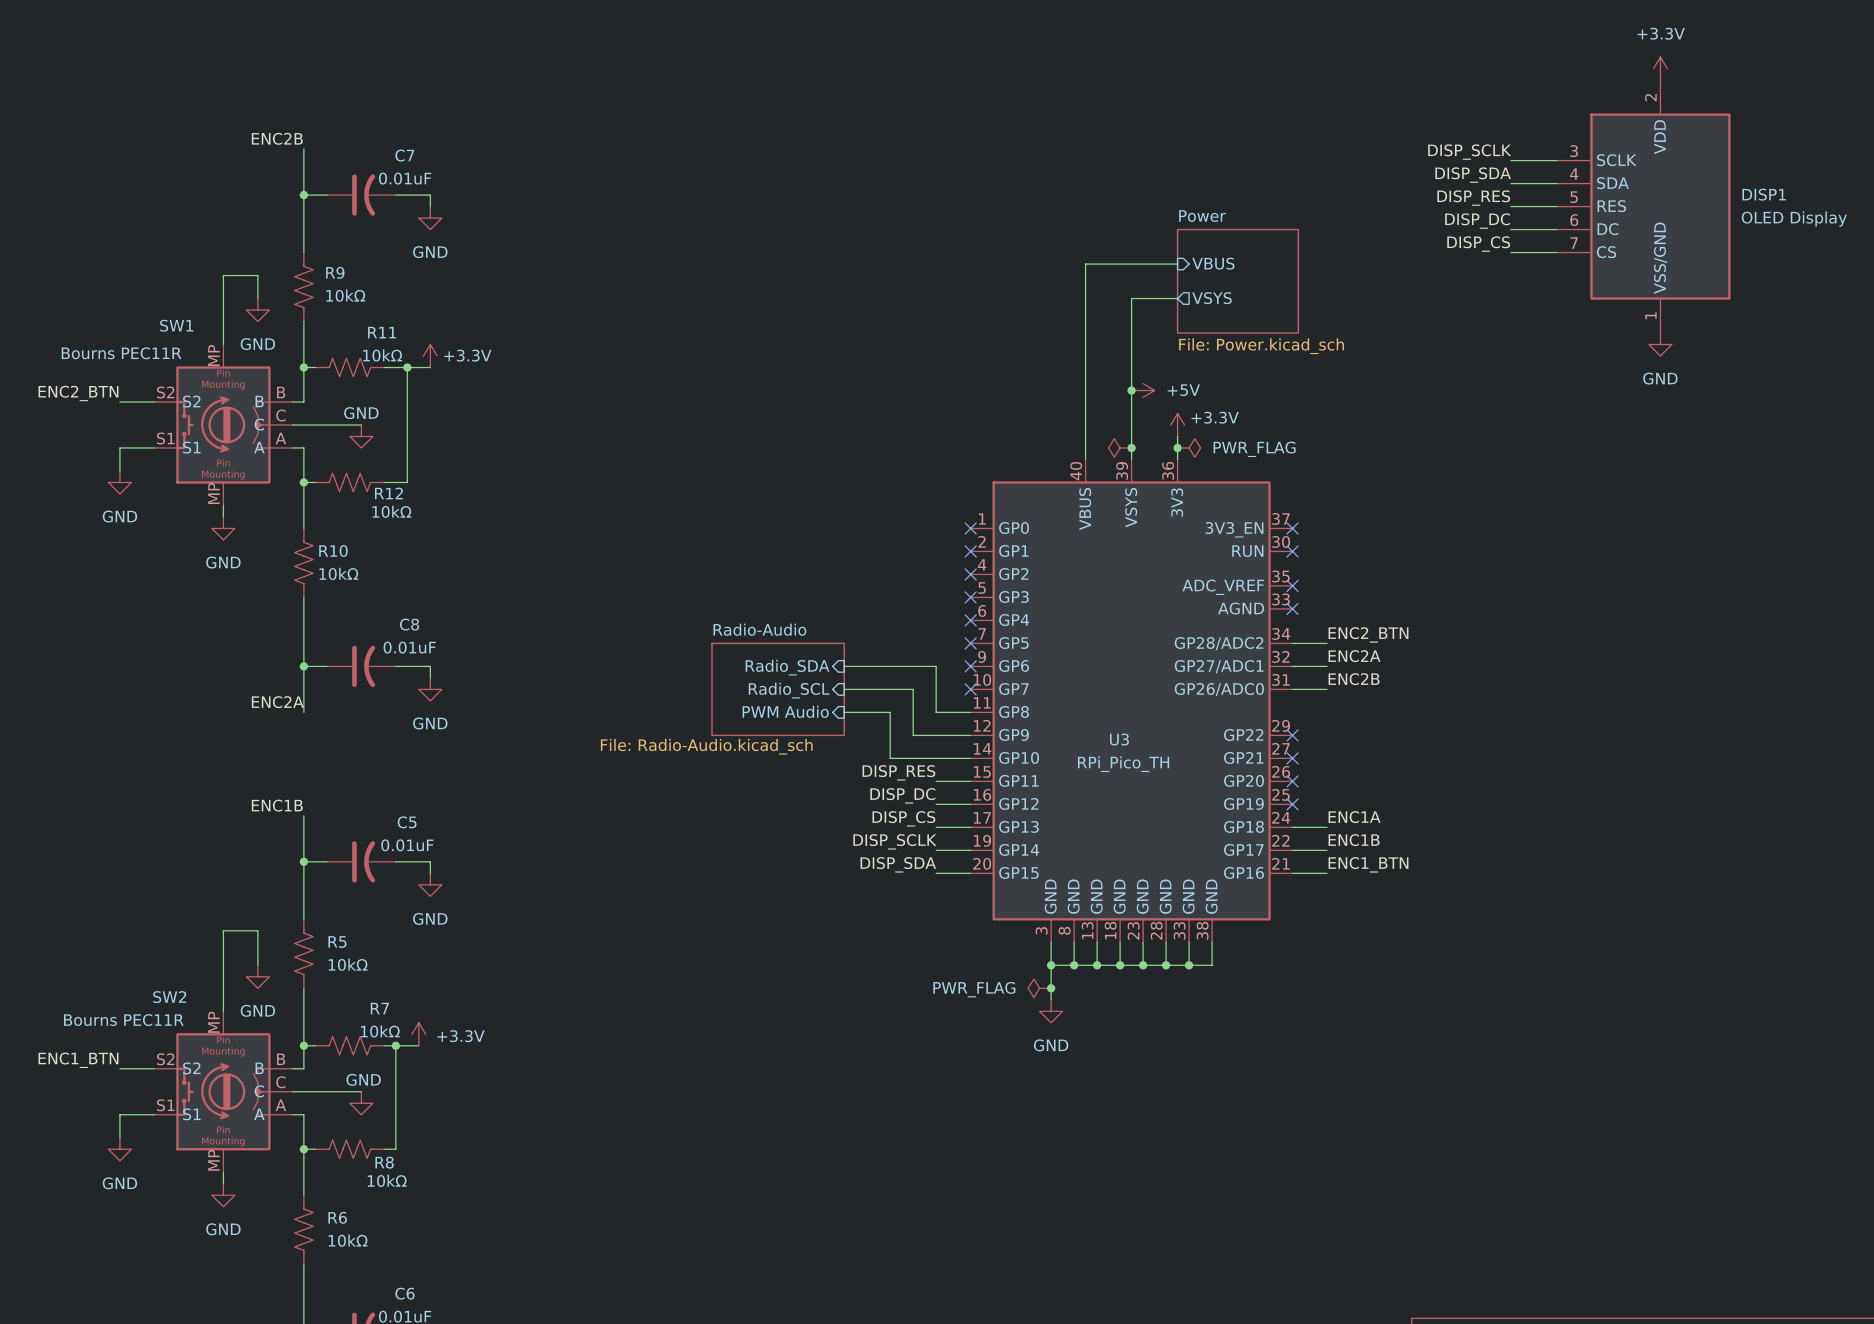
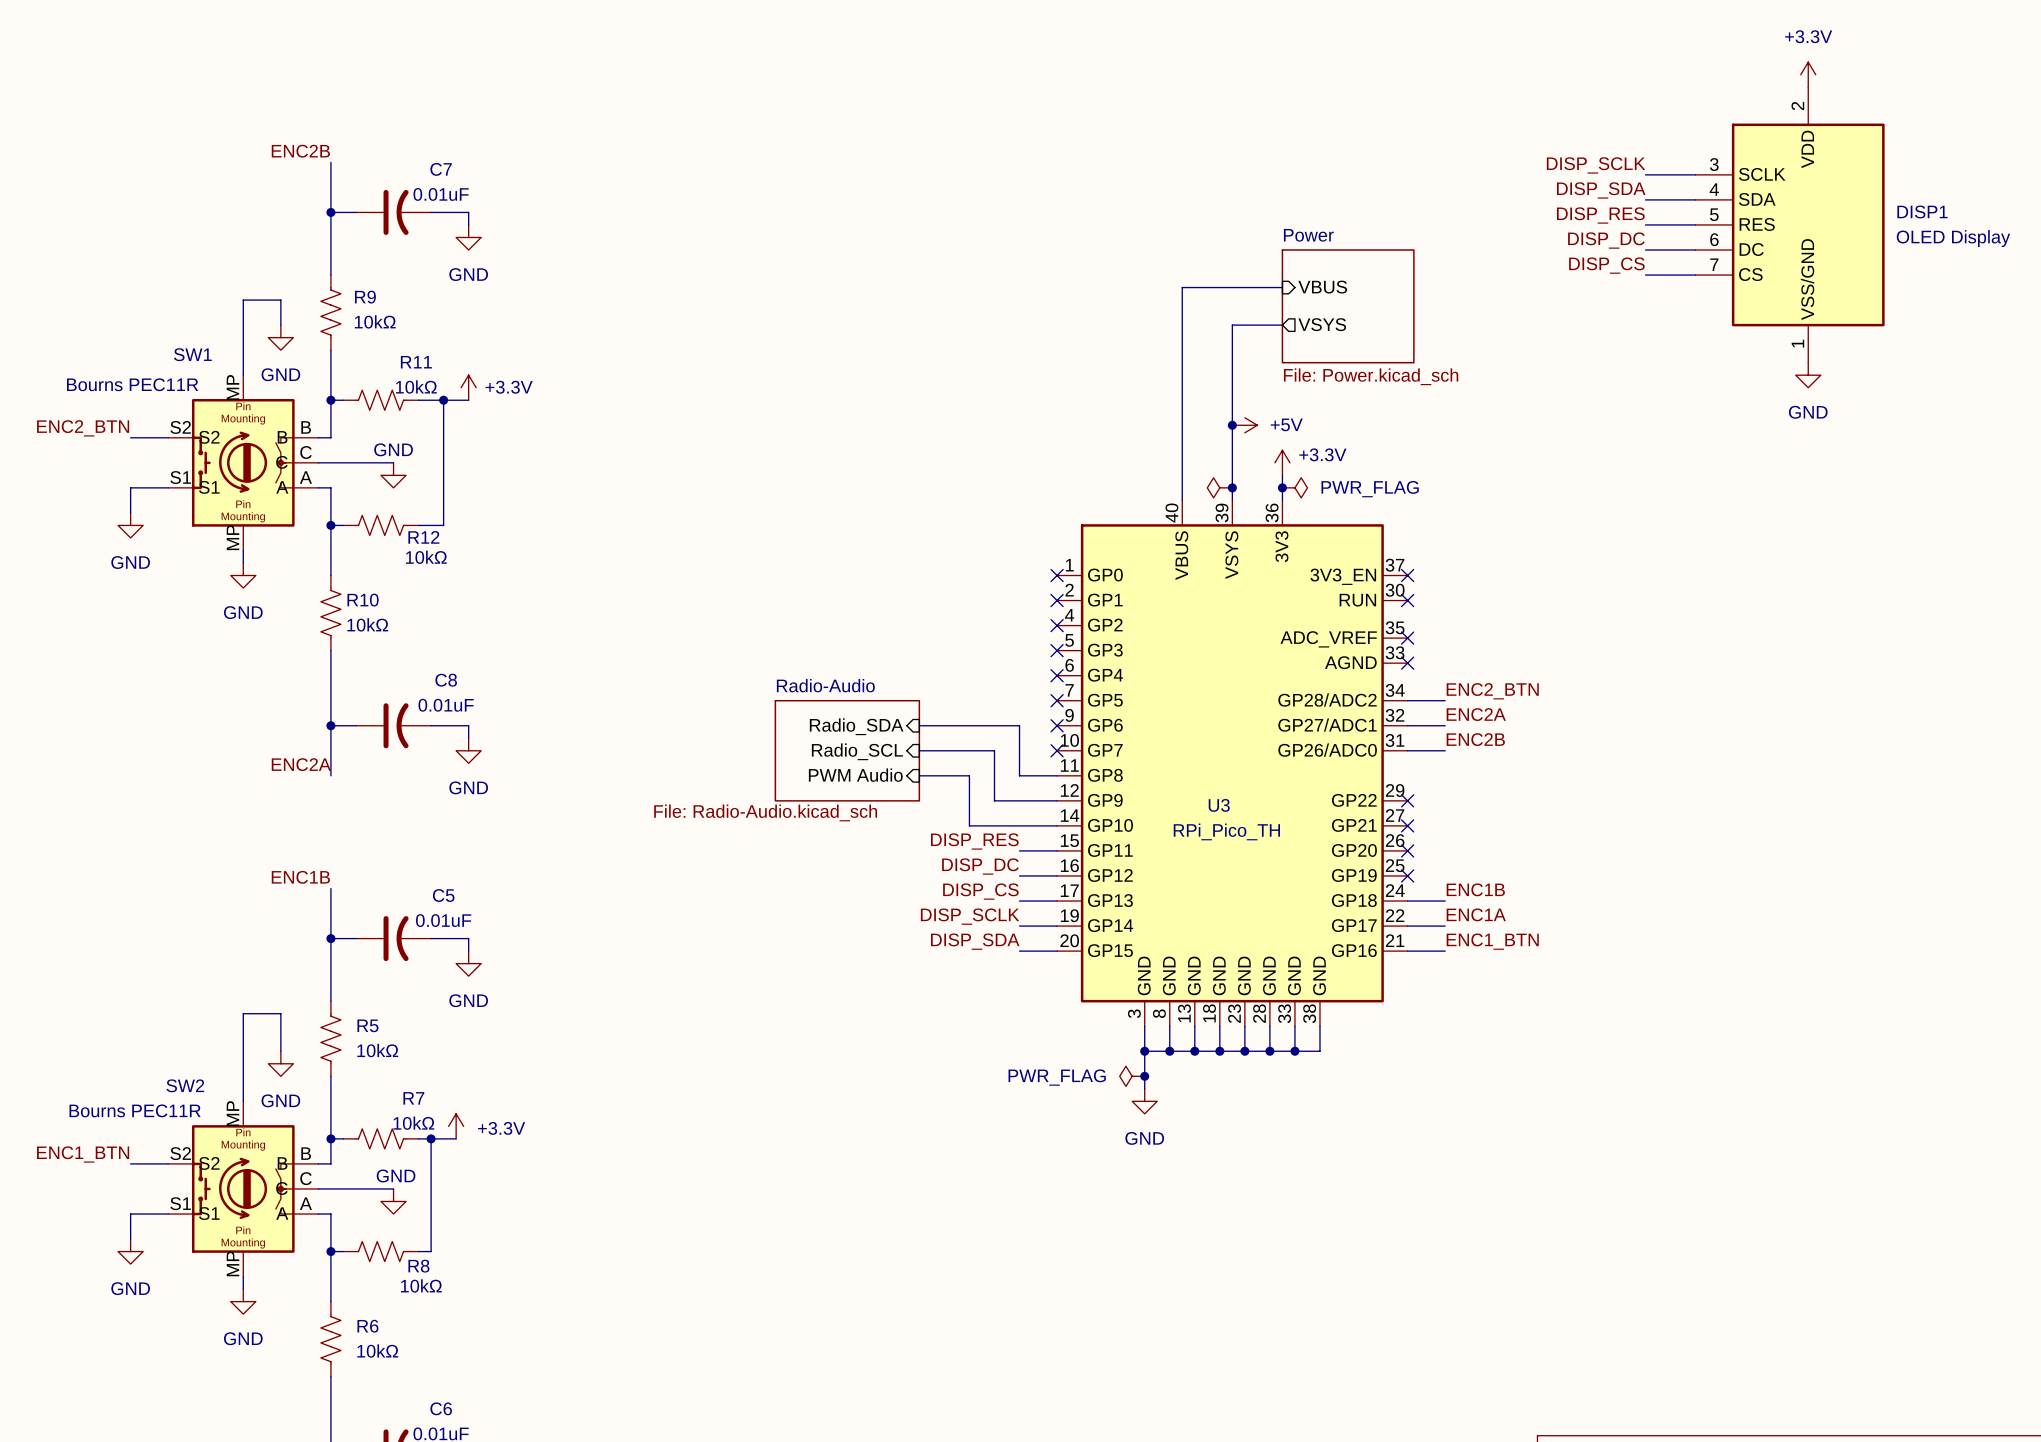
label: ENC1A (1354, 817) -> ENC1B (1475, 889)
label: ENC1B (1354, 840) -> ENC1A (1476, 914)

